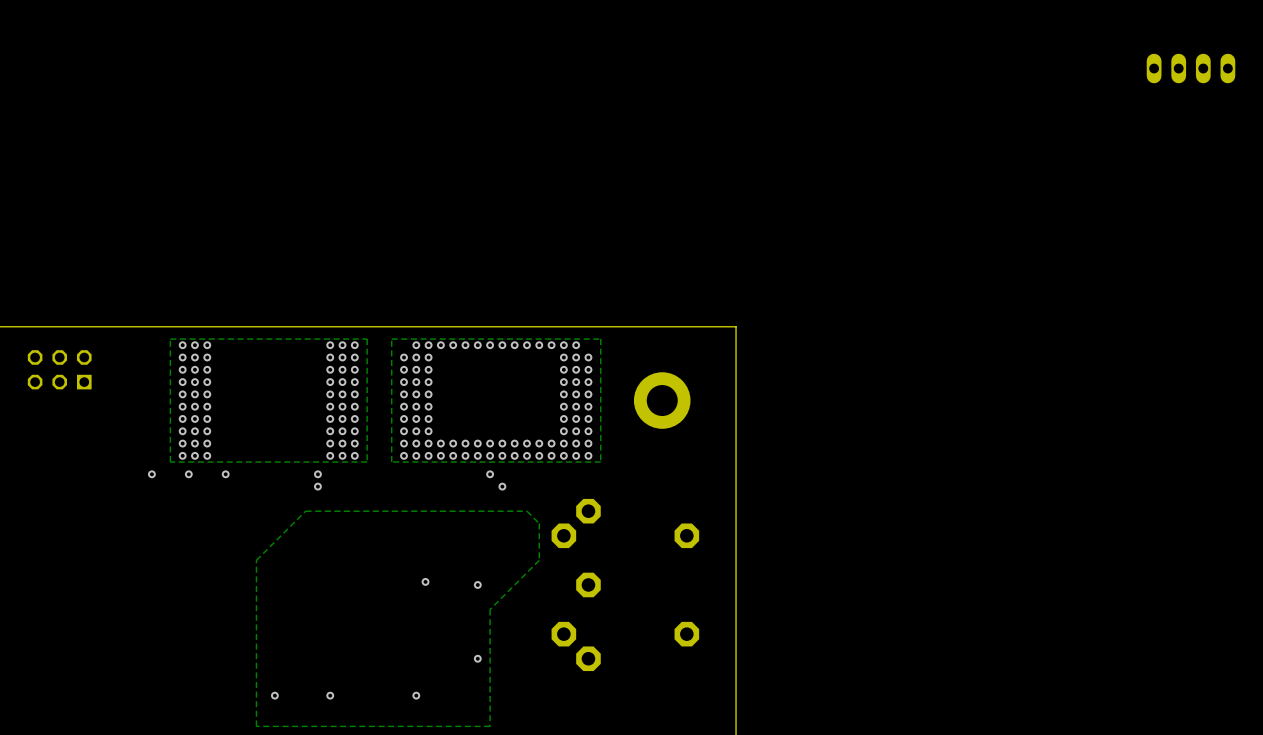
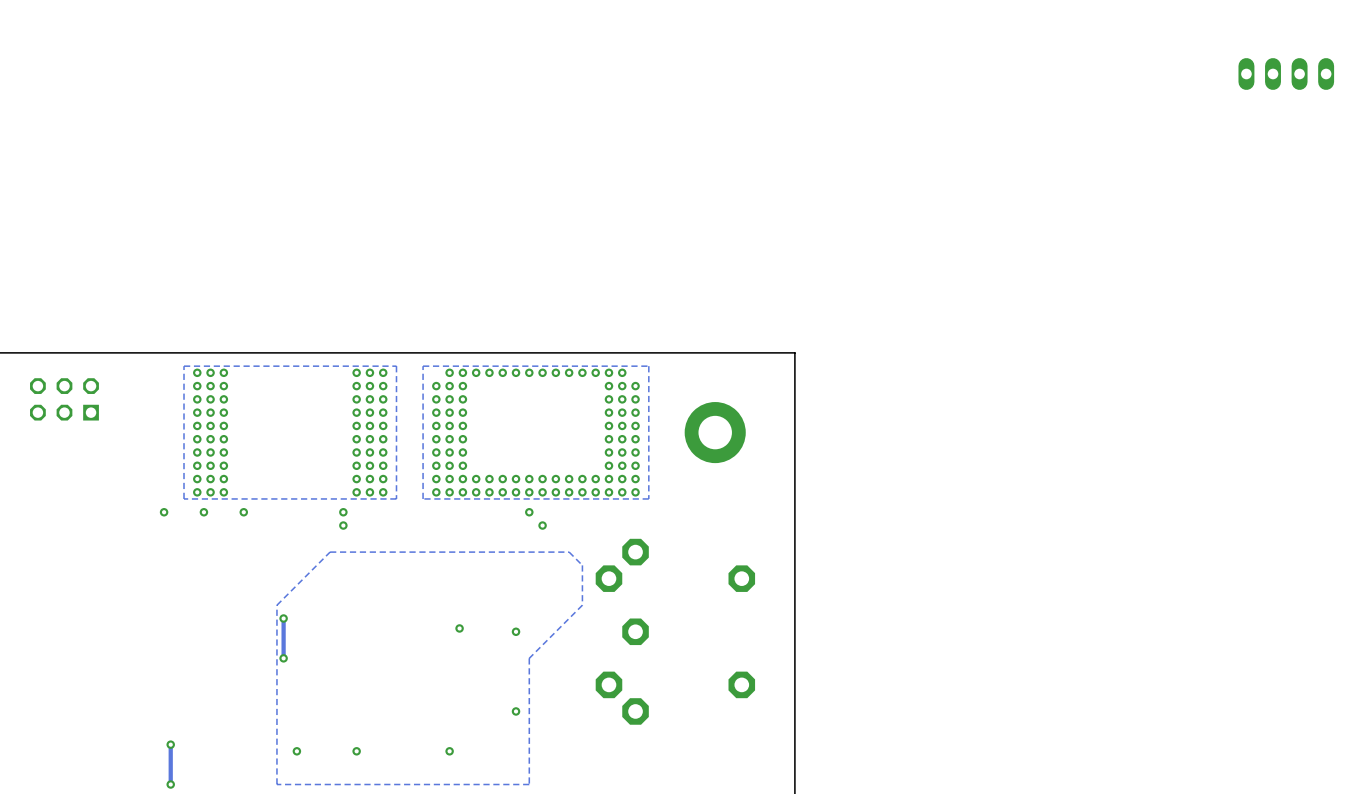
track: none -> (283, 618) (283, 658)
via: none -> (283, 618)
via: none -> (283, 658)
track: none -> (170, 744) (170, 784)
via: none -> (170, 744)
via: none -> (170, 784)

